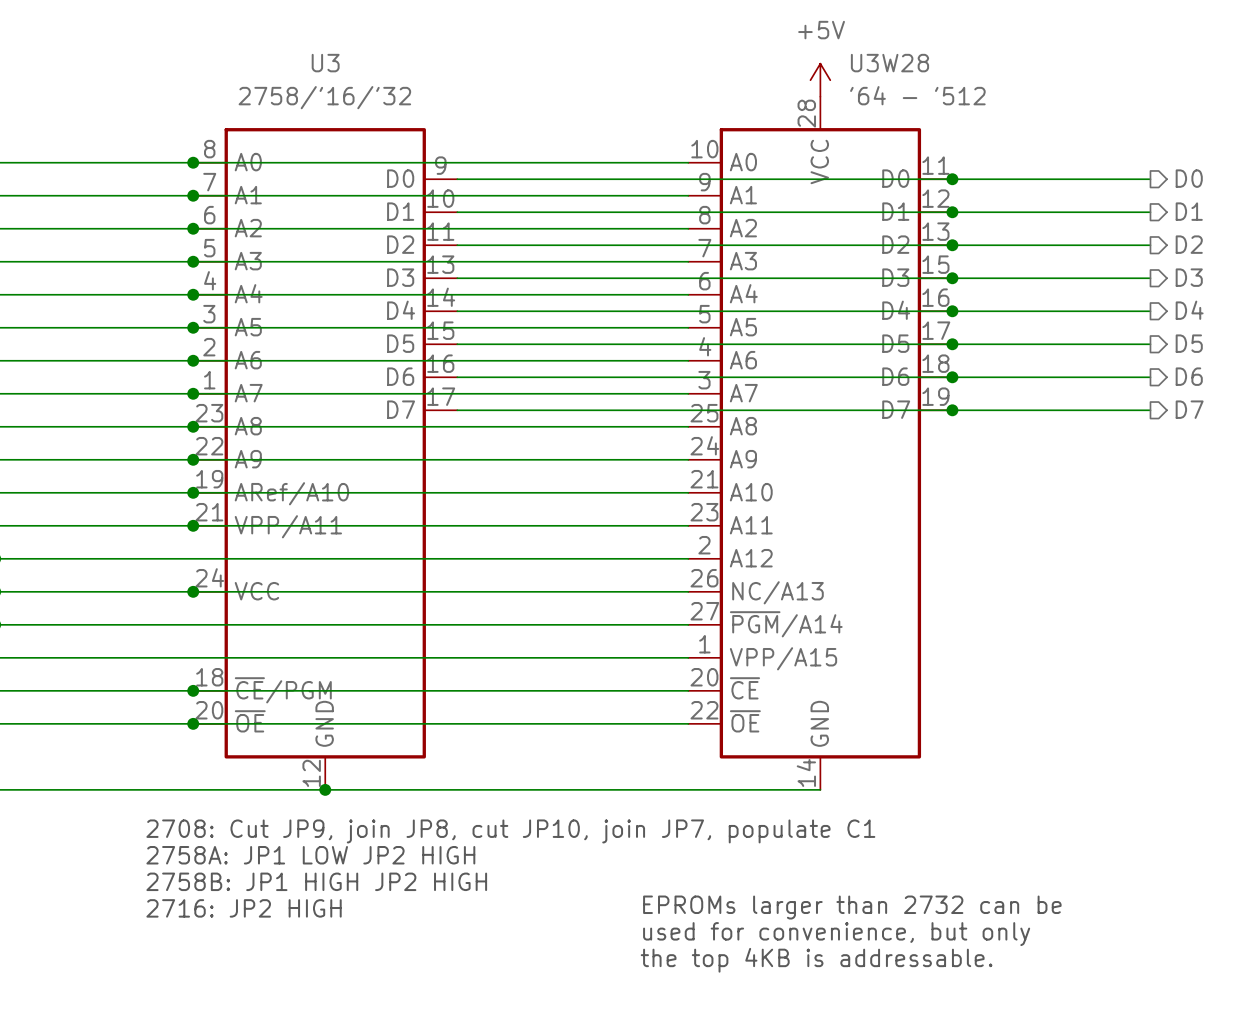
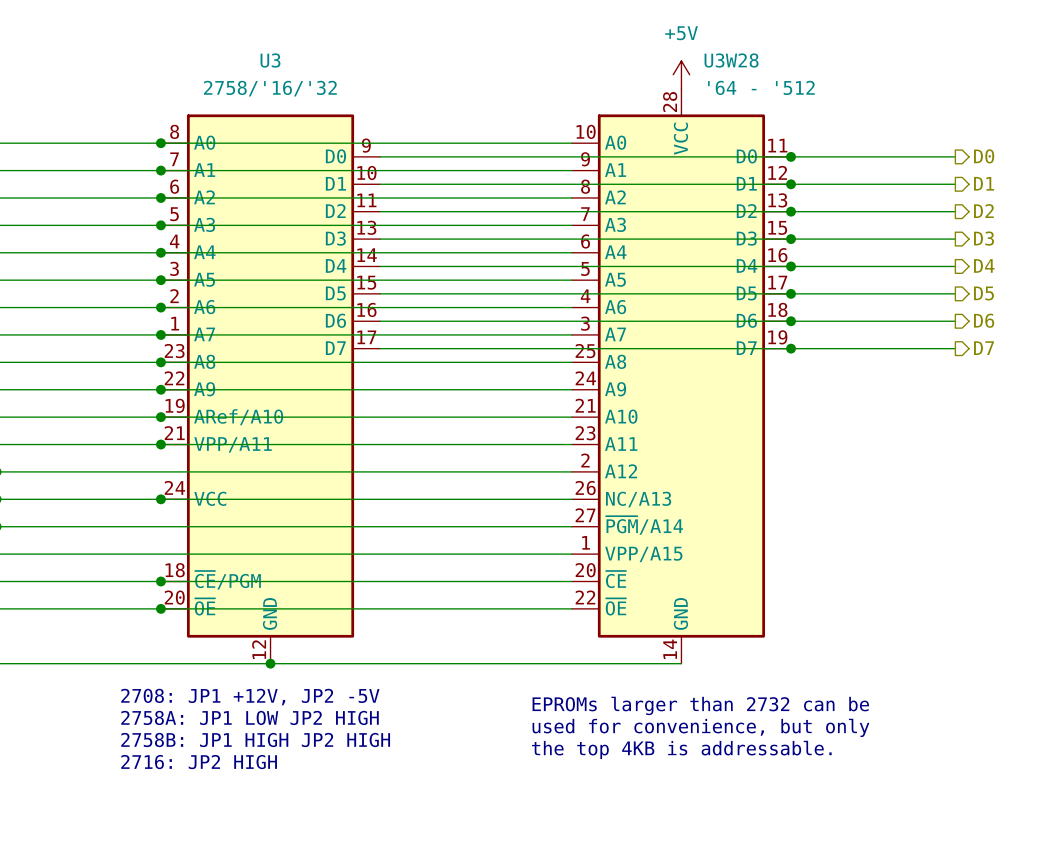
text: 2708: Cut JP9, join JP8, cut JP10, join JP7, populate C1 (510, 831) -> 2708: JP1 +12V, JP2 -5V (250, 697)
text: none -> EPROMs larger than 2732 can be (700, 705)
text: EPROMs larger than 2732 can be (852, 907) -> the top 4KB is addressable. (681, 749)
text position: used for convenience, but only (836, 934) -> used for convenience, but only (700, 727)
text: the top 4KB is addressable. (816, 960) -> none

